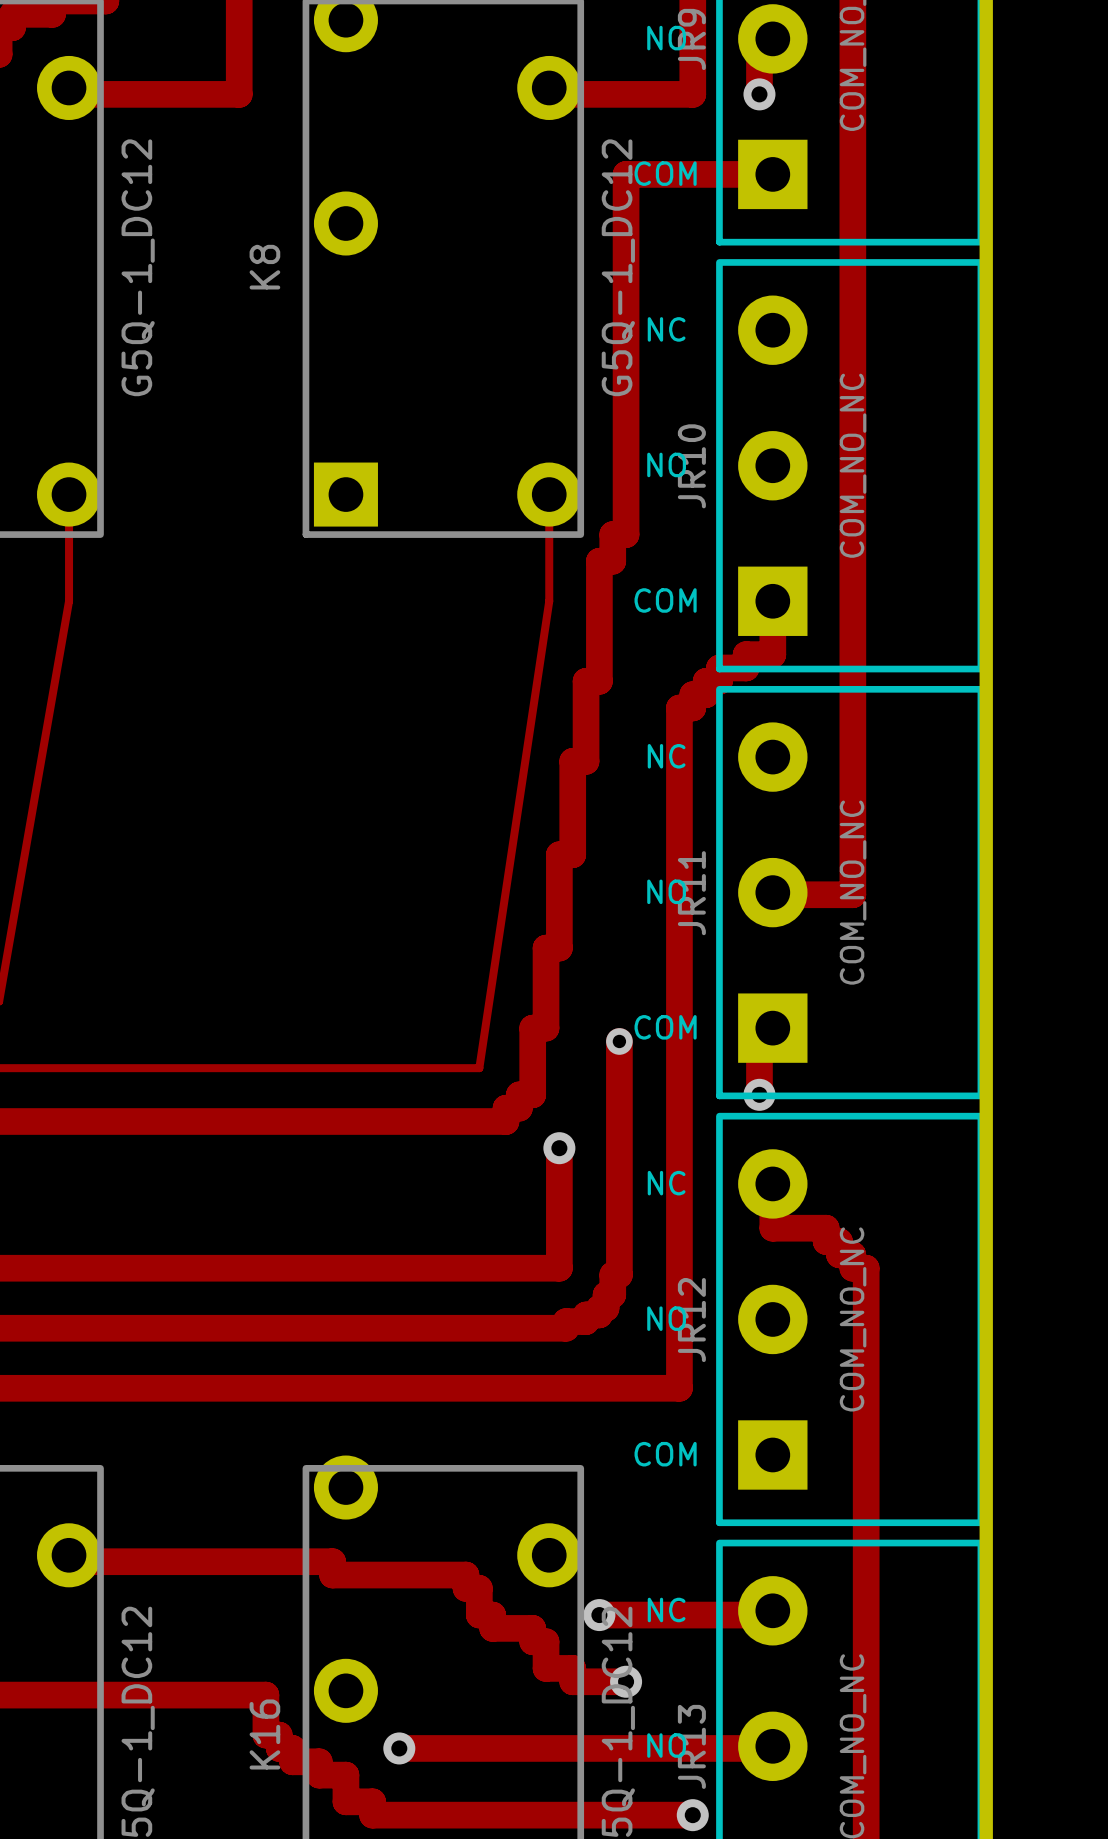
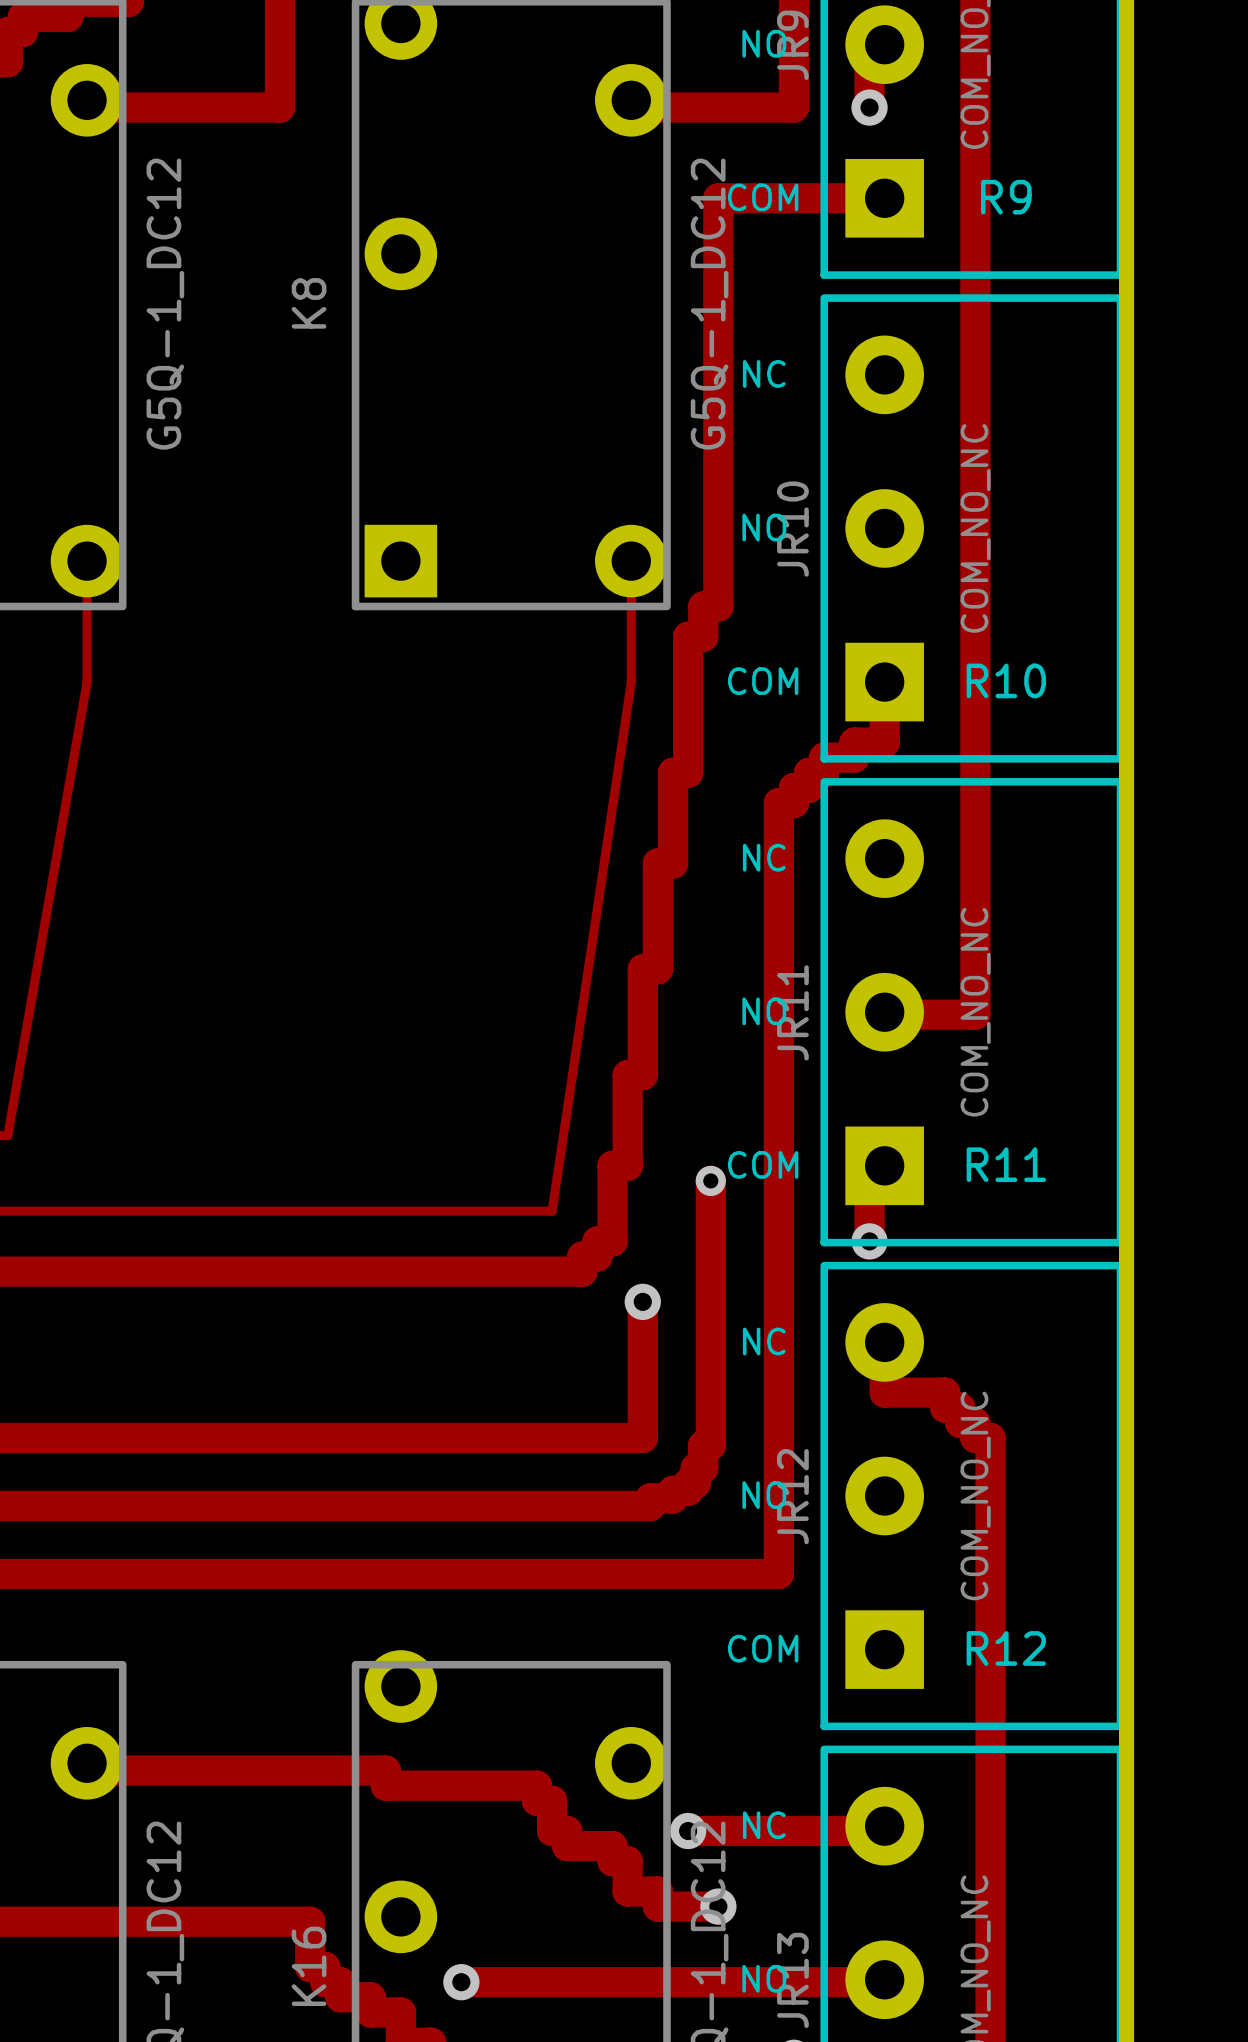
JR9 text: none -> R9 (1006, 197)
JR10 text: none -> R10 (1006, 680)
JR11 text: none -> R11 (1006, 1164)
JR12 text: none -> R12 (1006, 1648)

